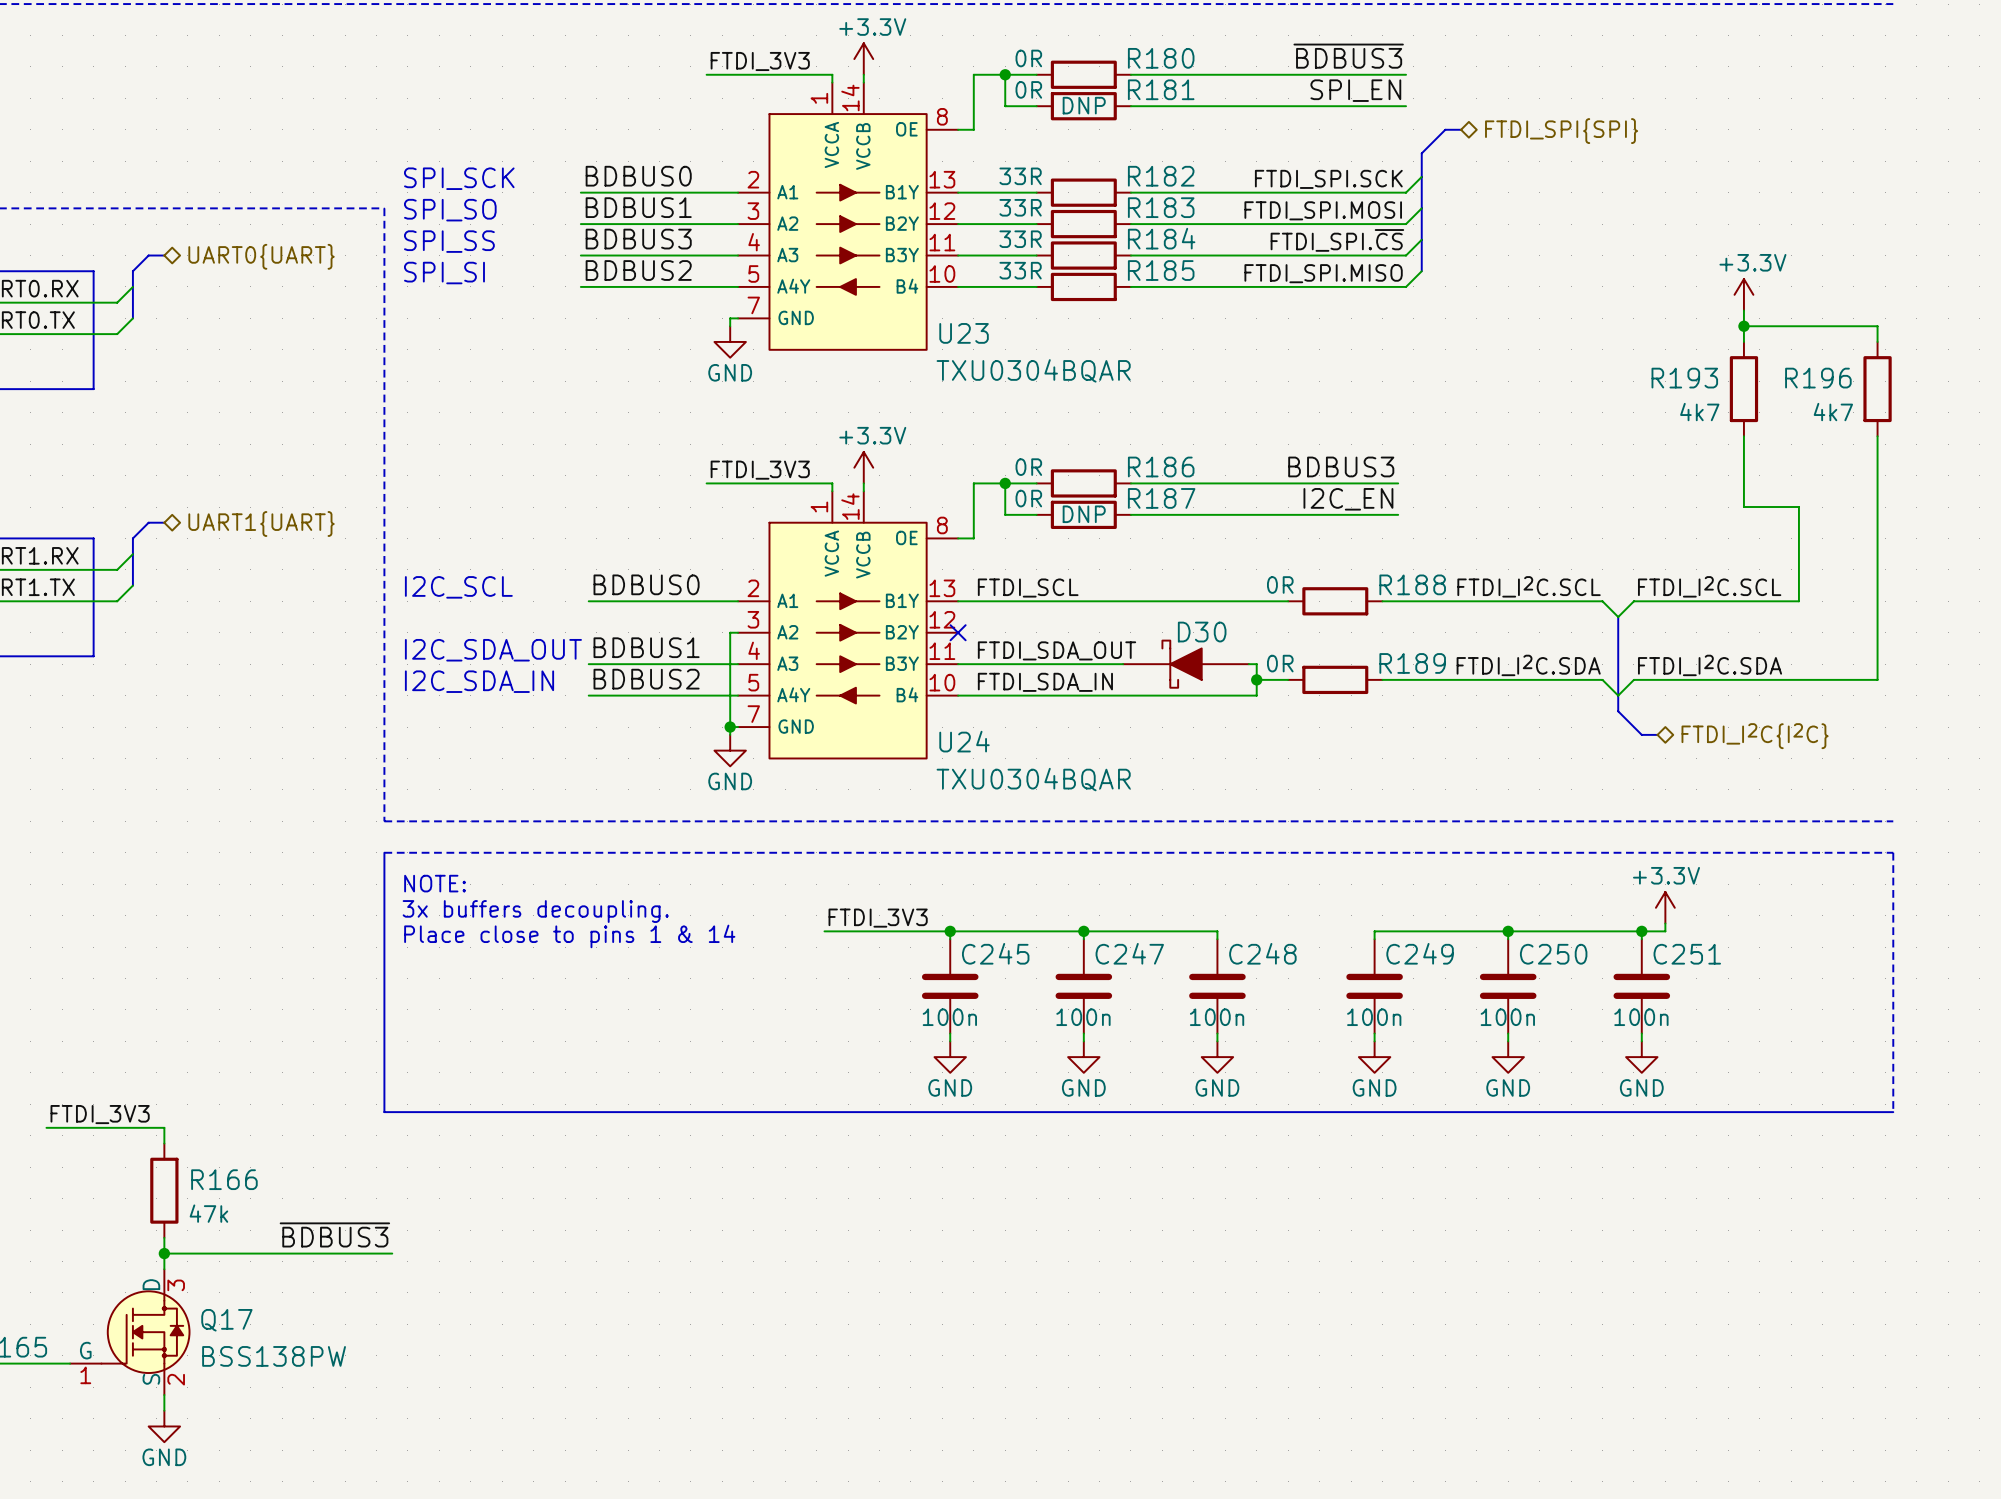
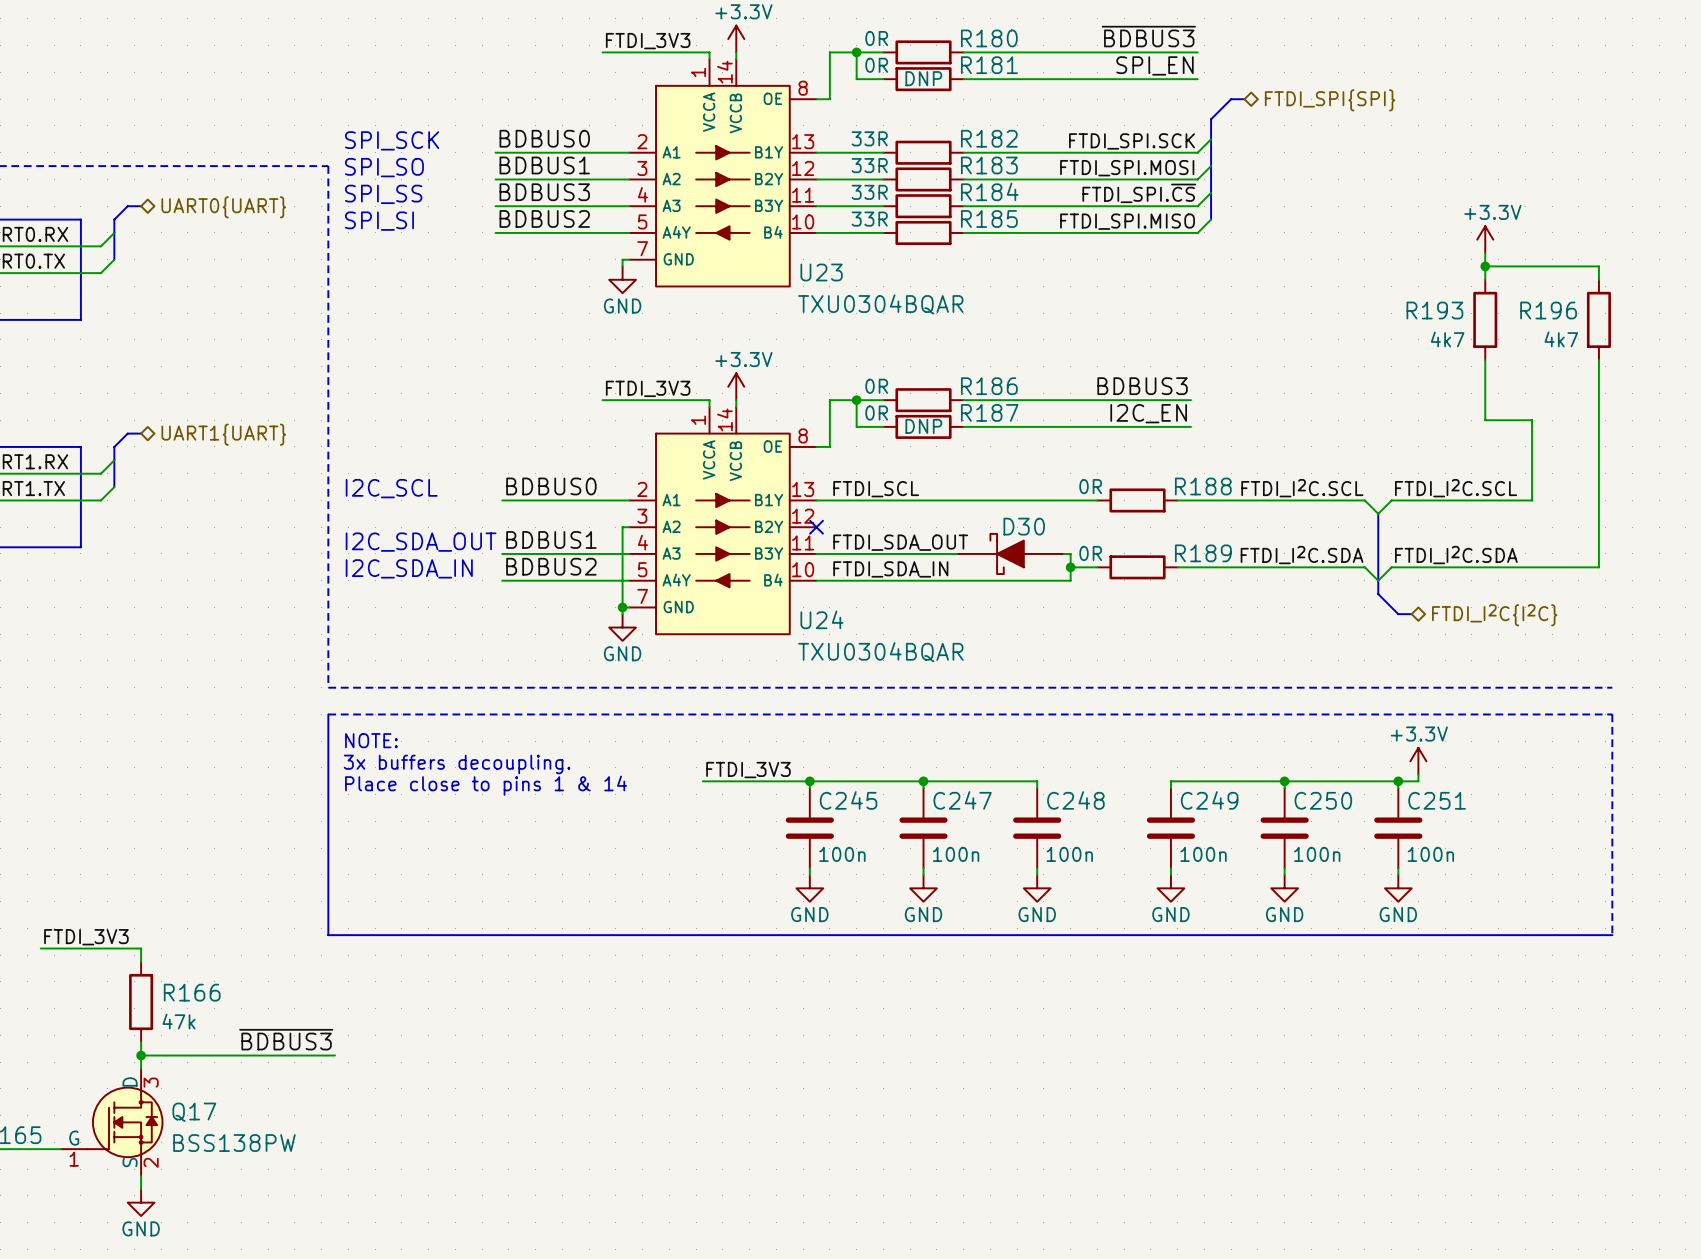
C245 text position: 100n (949, 1017) -> 100n (842, 854)
C247 text position: 100n (1083, 1017) -> 100n (956, 854)
C248 text position: 100n (1217, 1017) -> 100n (1069, 854)
C249 text position: 100n (1374, 1017) -> 100n (1203, 854)
C250 text position: 100n (1507, 1017) -> 100n (1317, 854)
C251 text position: 100n (1641, 1017) -> 100n (1430, 854)

